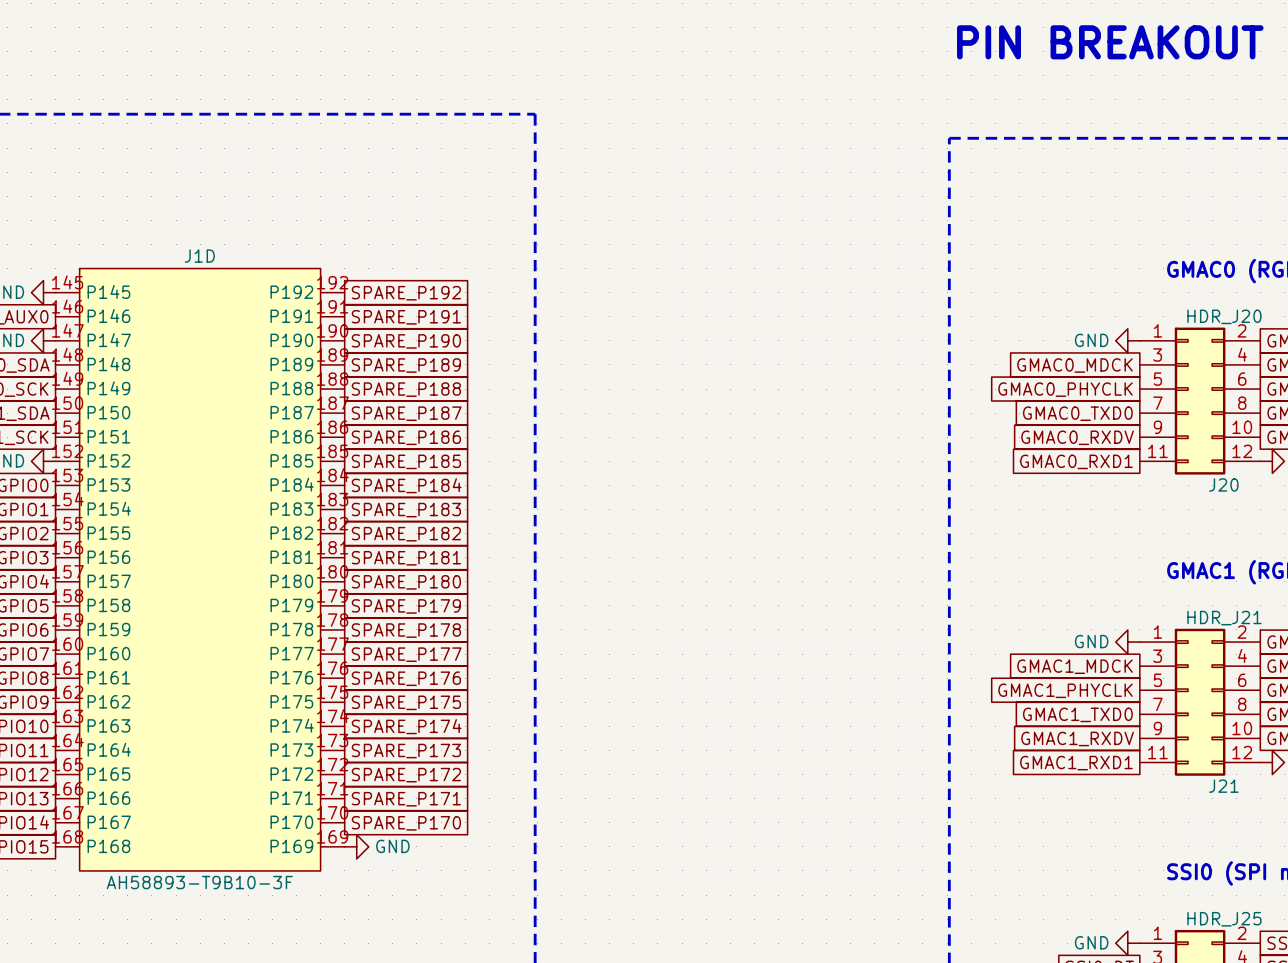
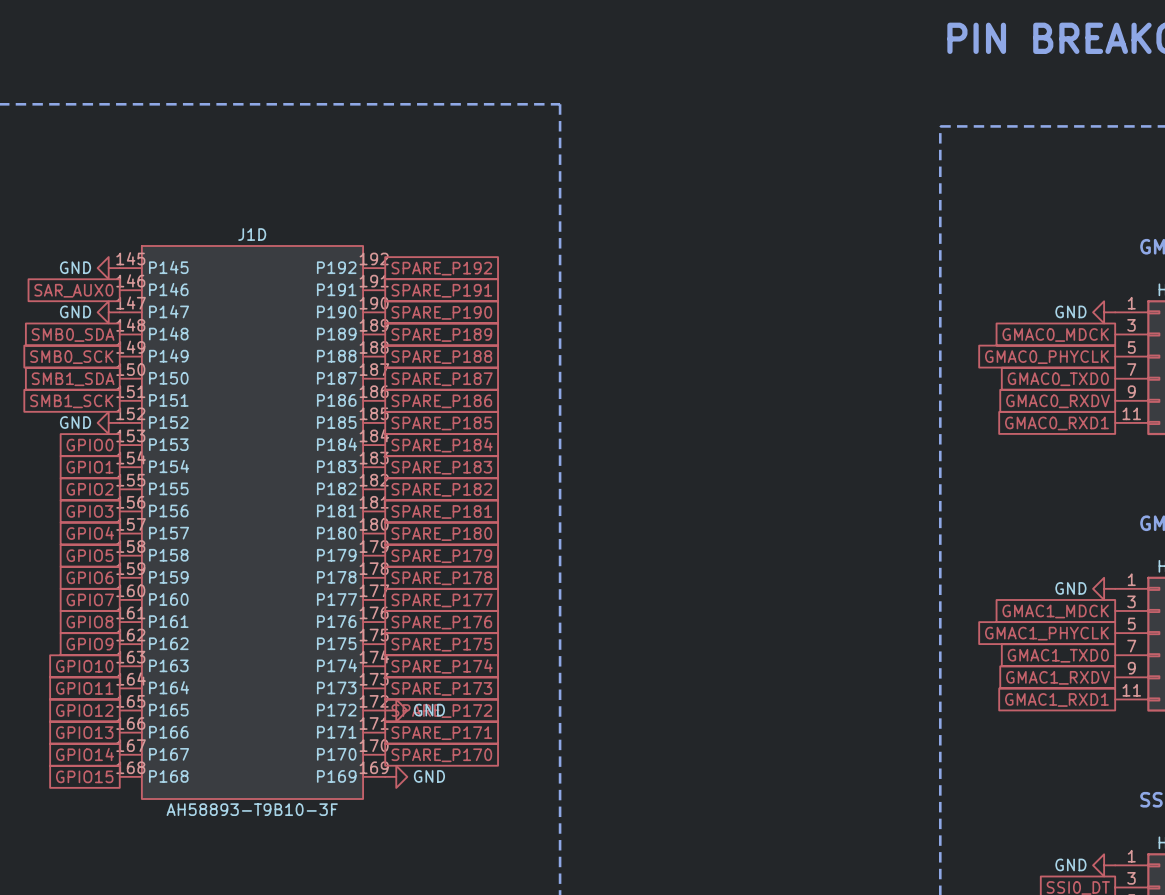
power symbol: none -> GND (396, 710)

